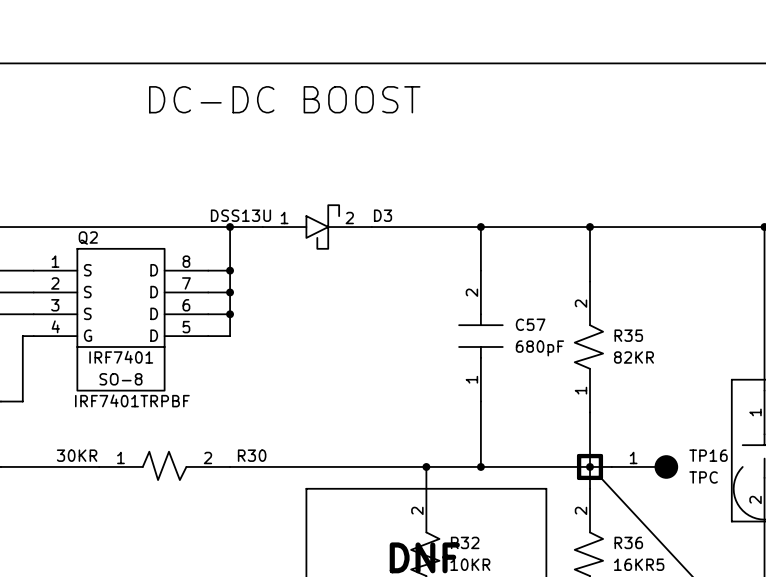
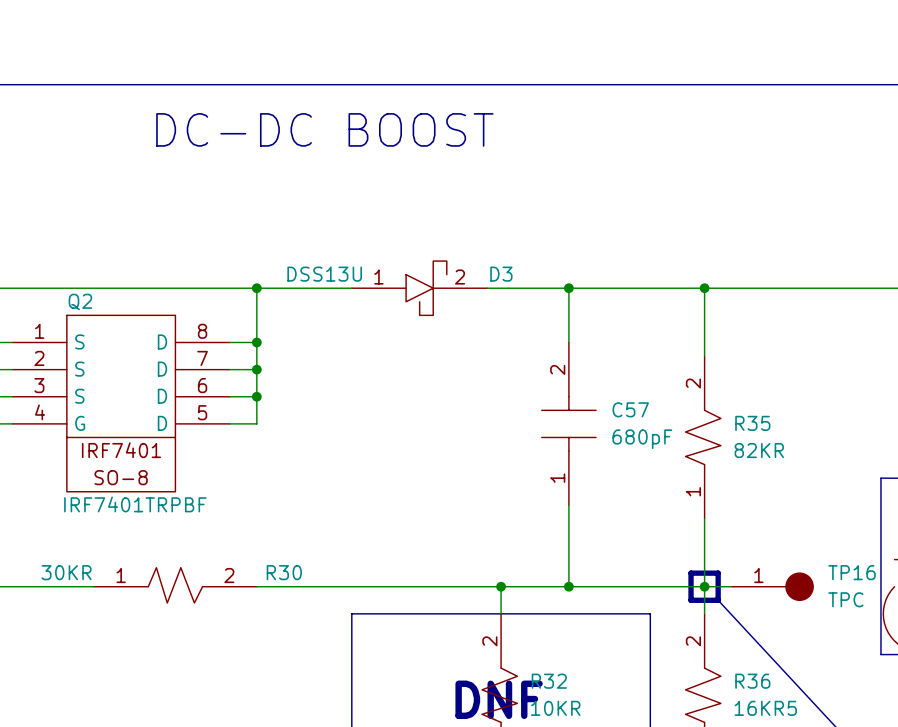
D3 position: (317, 227) -> (419, 288)

